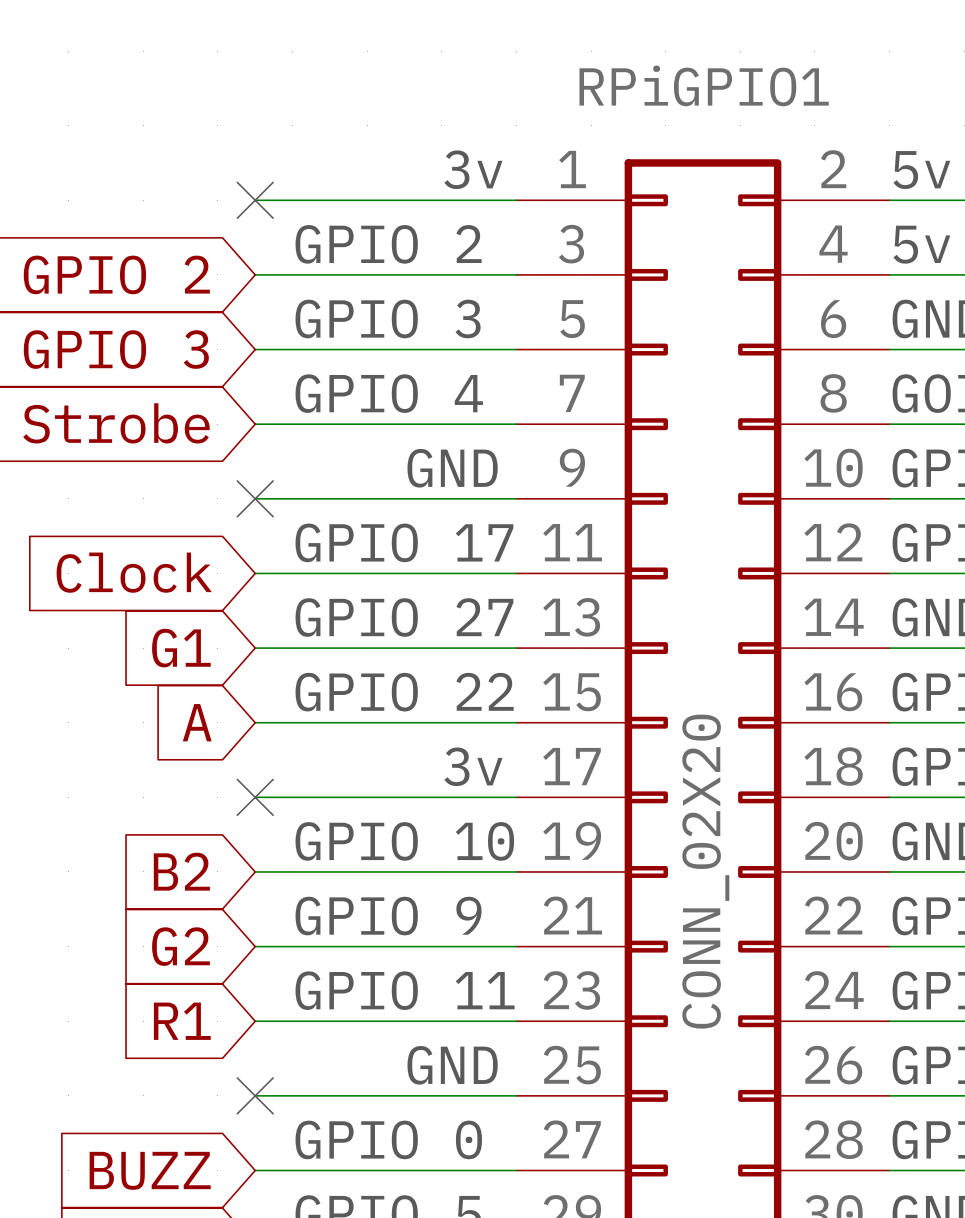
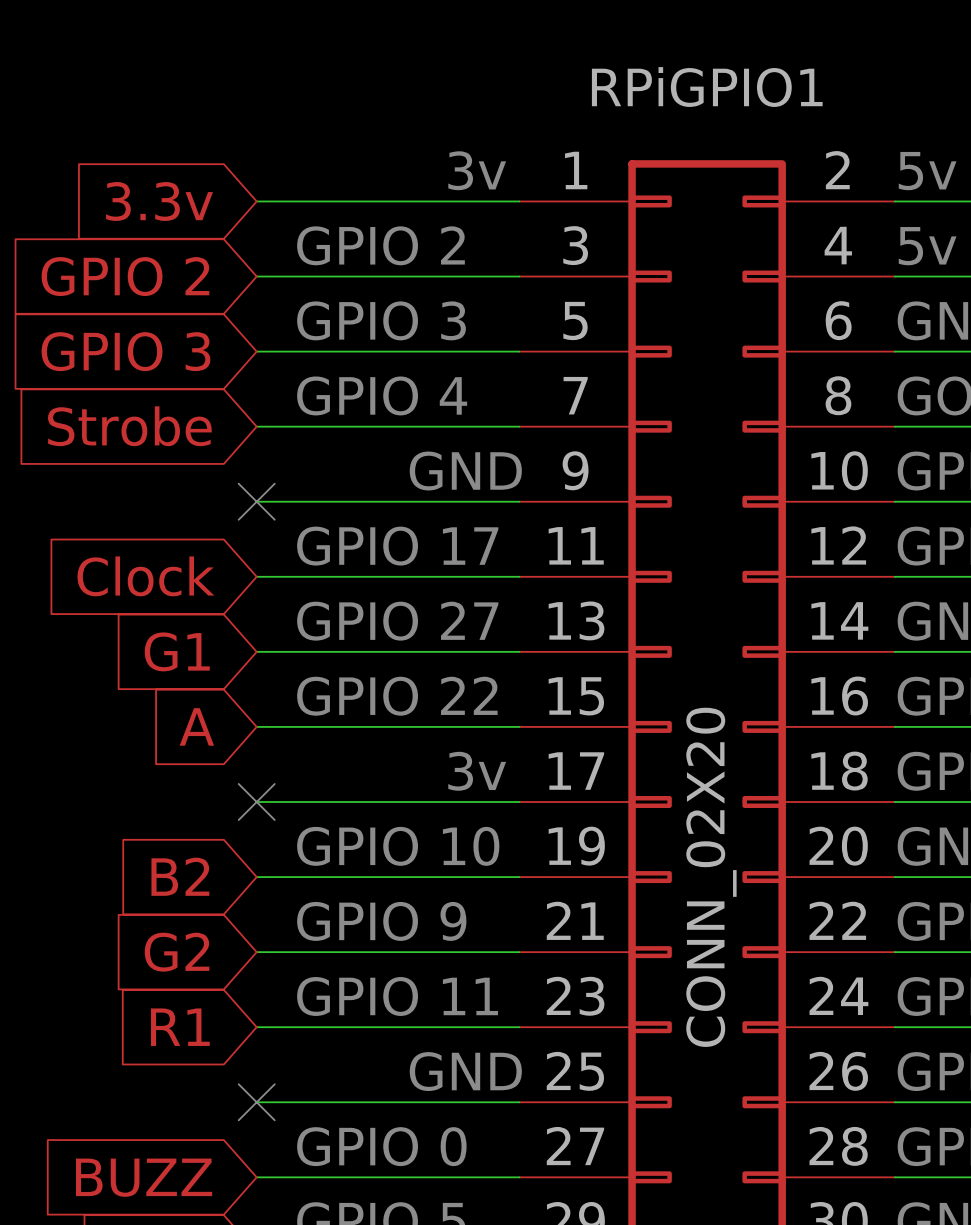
global label: none -> 3.3v (159, 201)
no-connect mark: (255, 200) -> none

